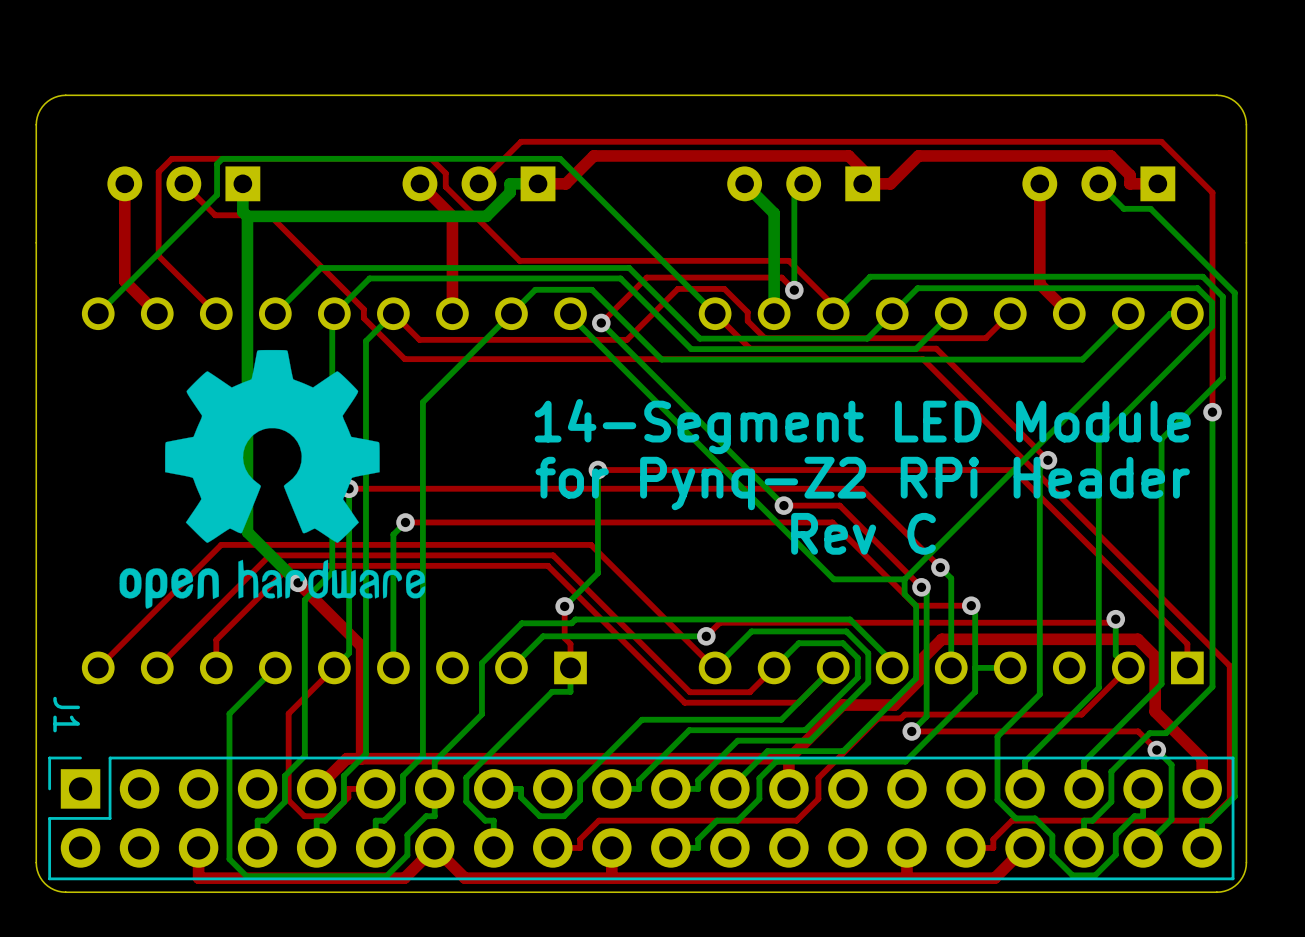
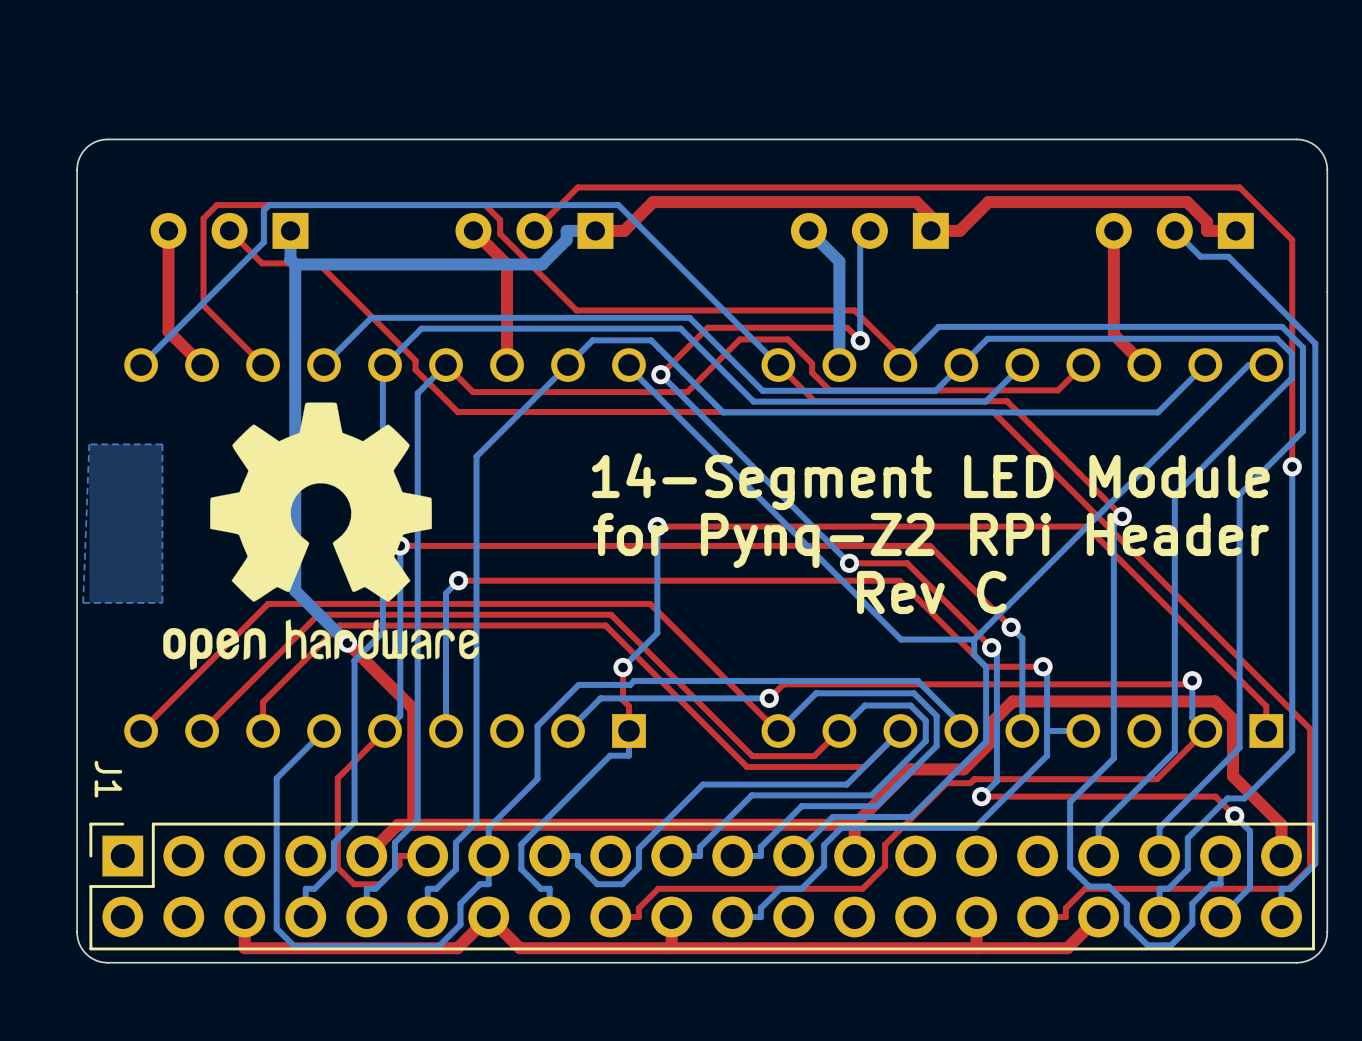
bottom zone outline: none -> (162, 444) (162, 602) (83, 602) (89, 444) (162, 444)

